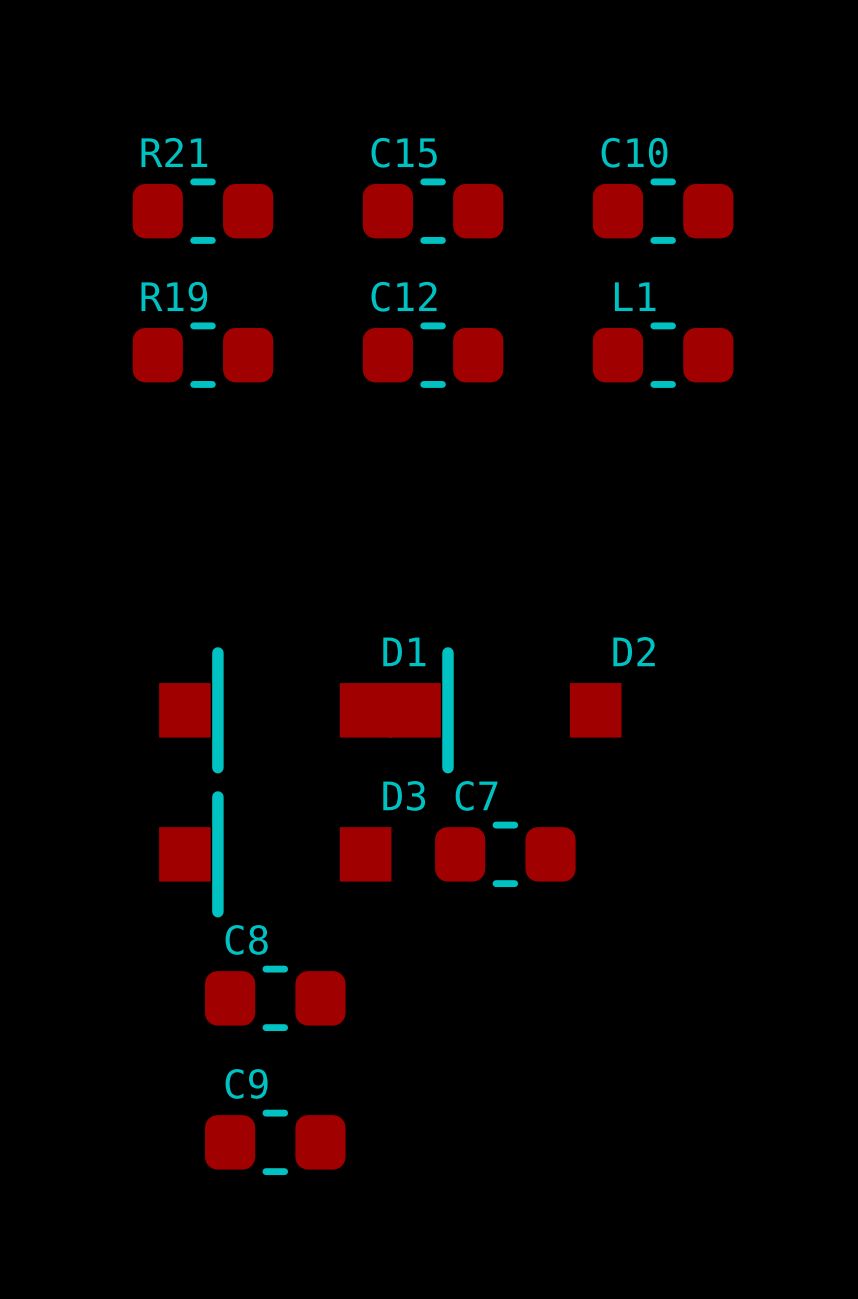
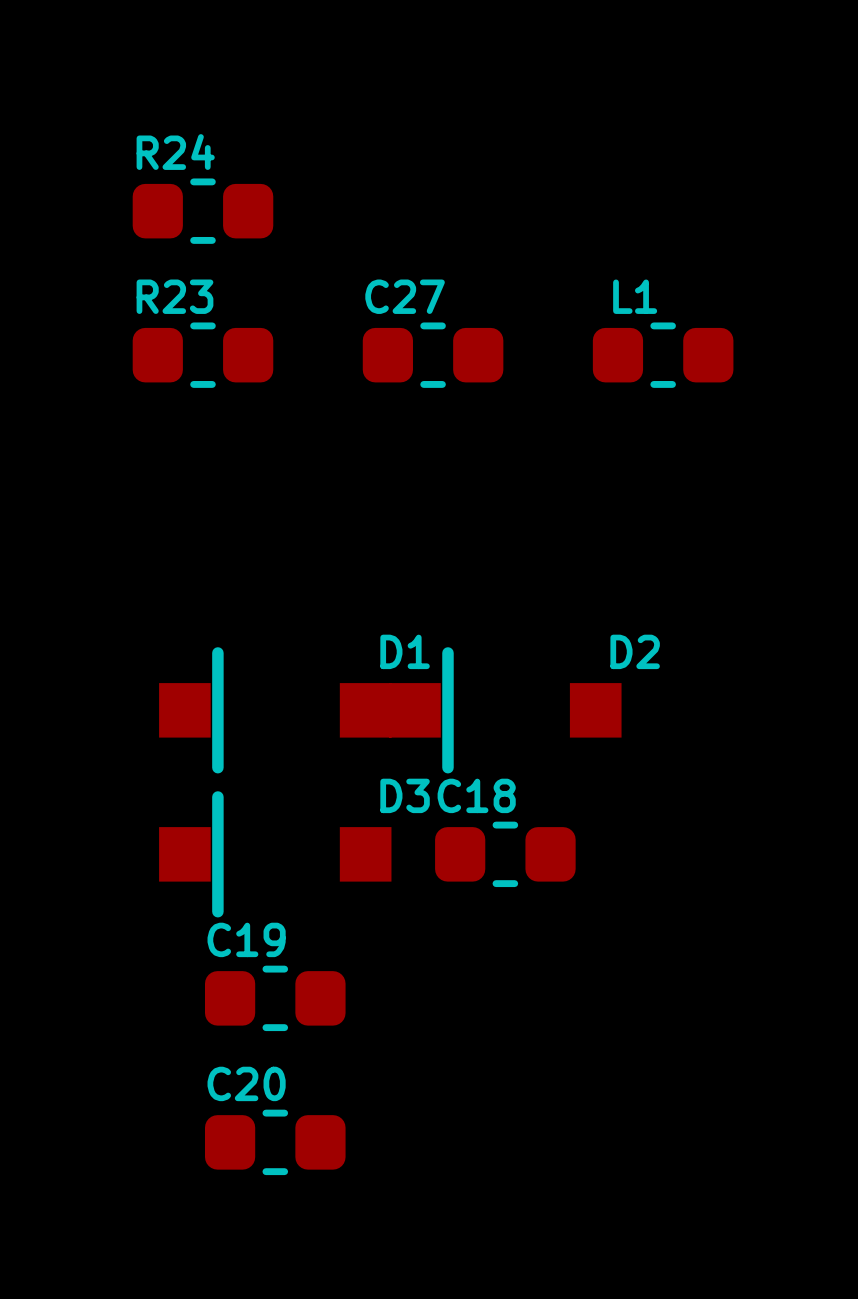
R21 name: R21 (174, 152) -> R24 (175, 152)
C15: (433, 211) -> none
C10: (663, 211) -> none
R19 name: R19 (174, 296) -> R23 (174, 296)
C12 name: C12 (404, 296) -> C27 (405, 296)
C7 name: C7 (476, 795) -> C18 (476, 795)
C8 name: C8 (246, 939) -> C19 (246, 939)
C9 name: C9 (246, 1083) -> C20 (246, 1083)

